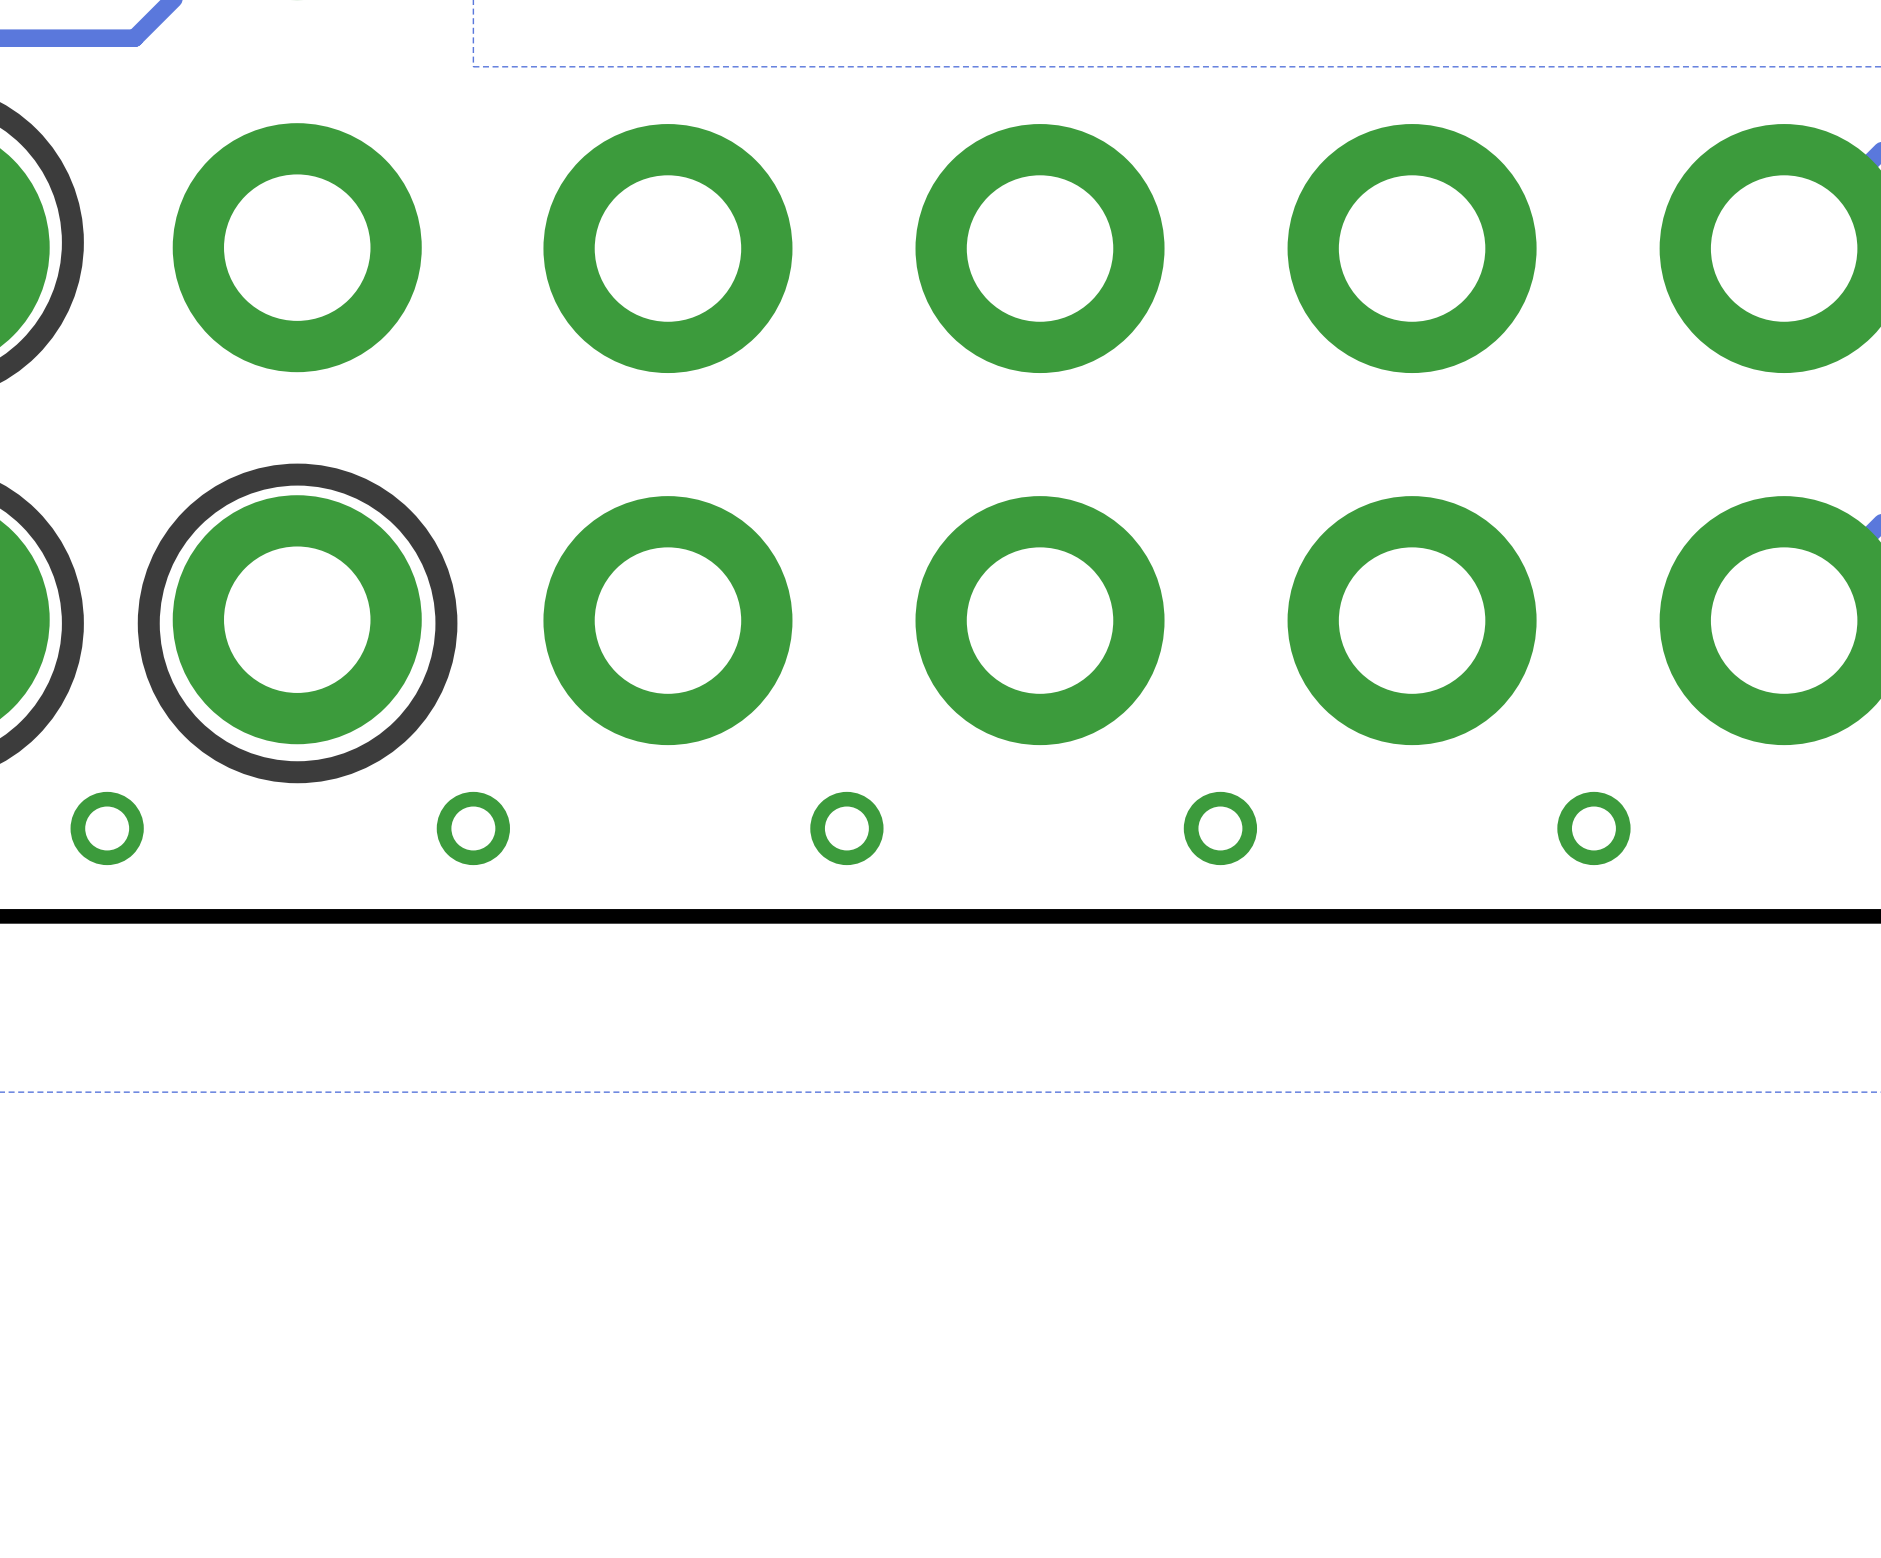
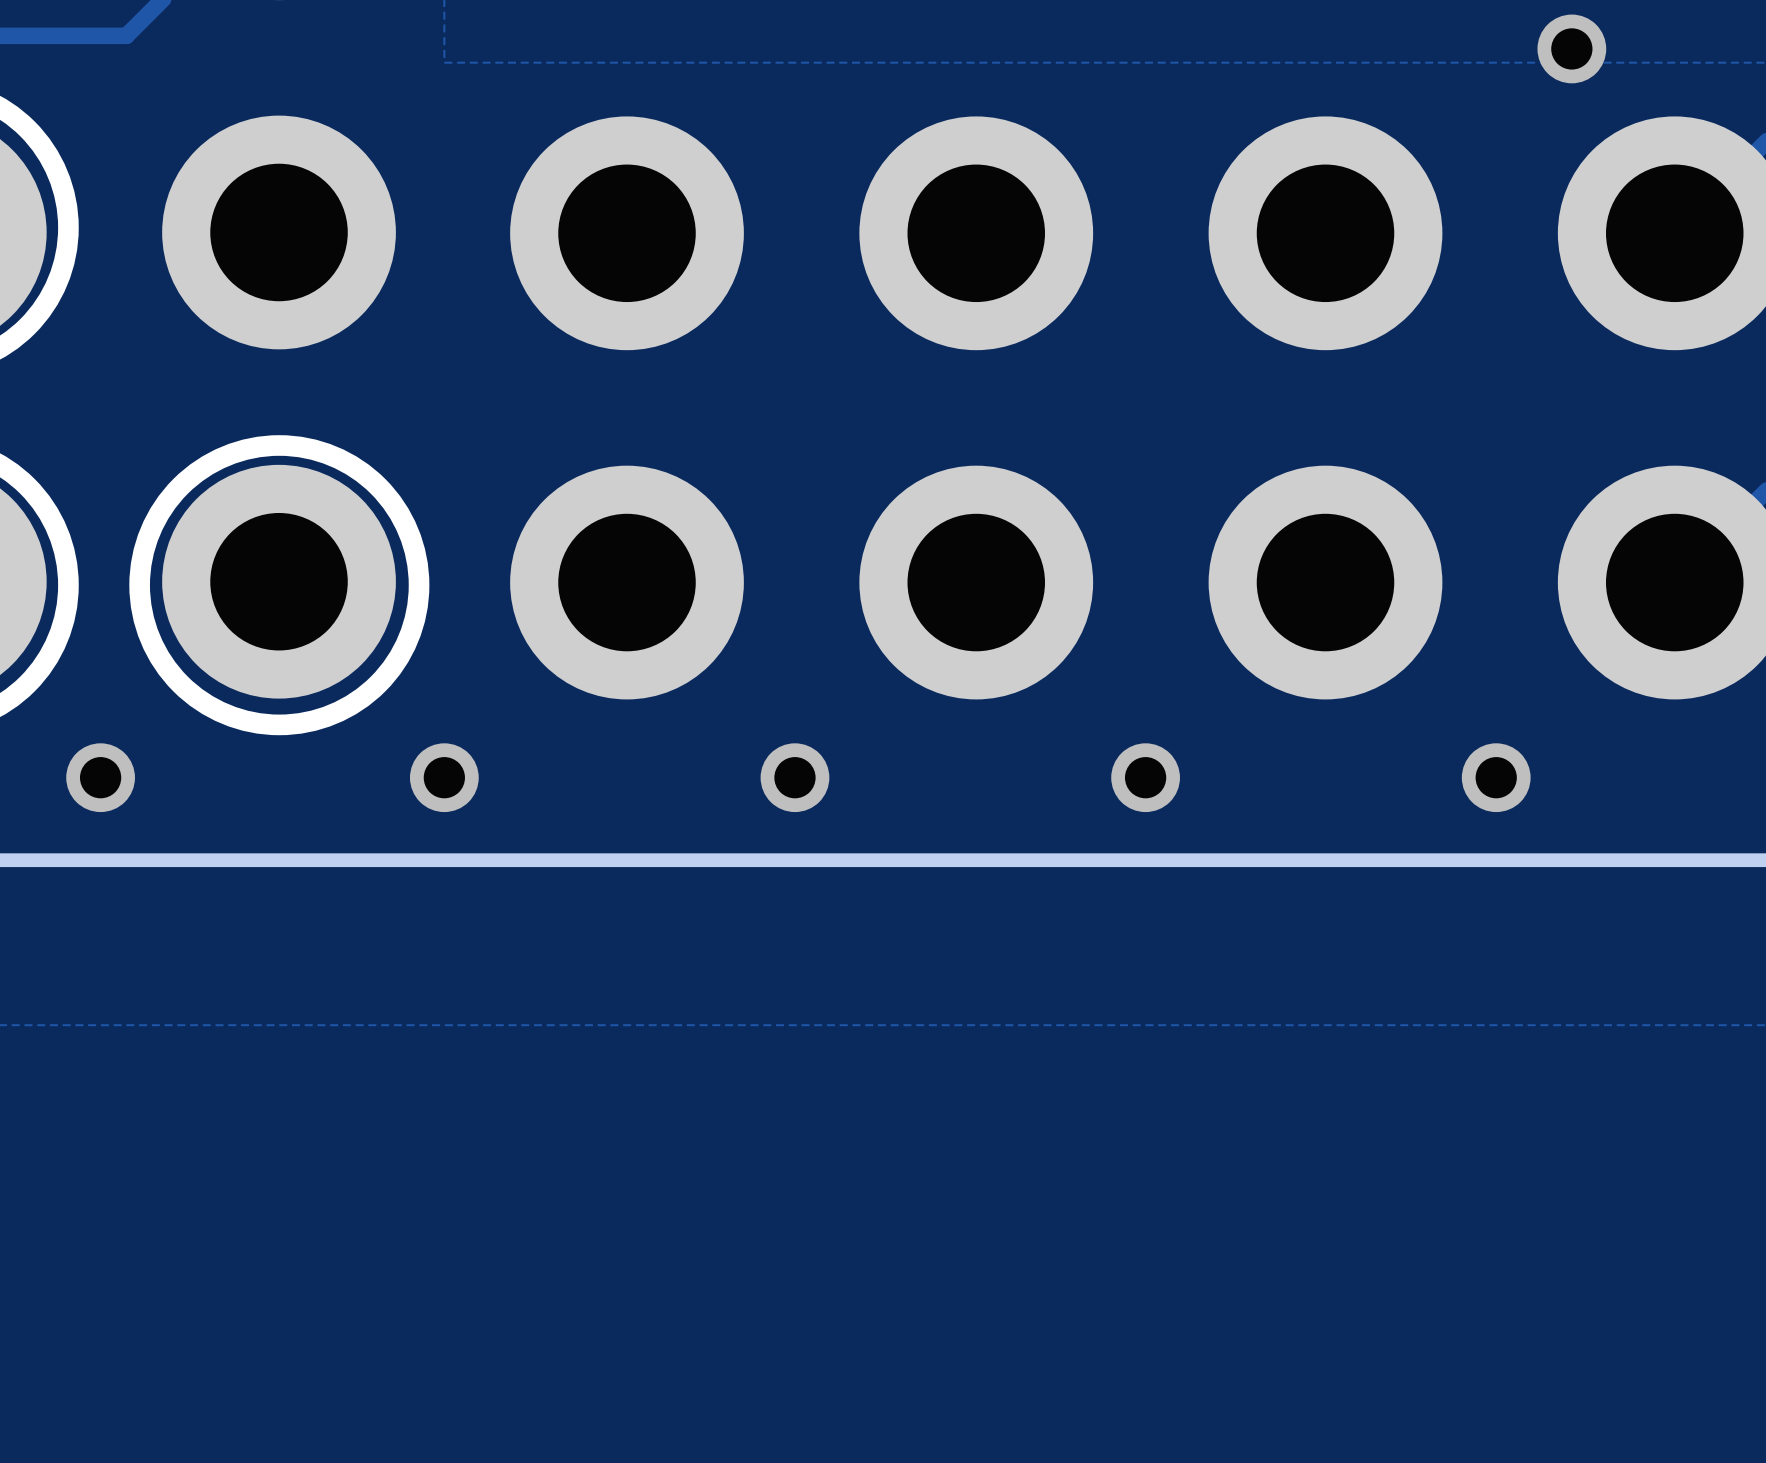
via: none -> (1571, 48)

